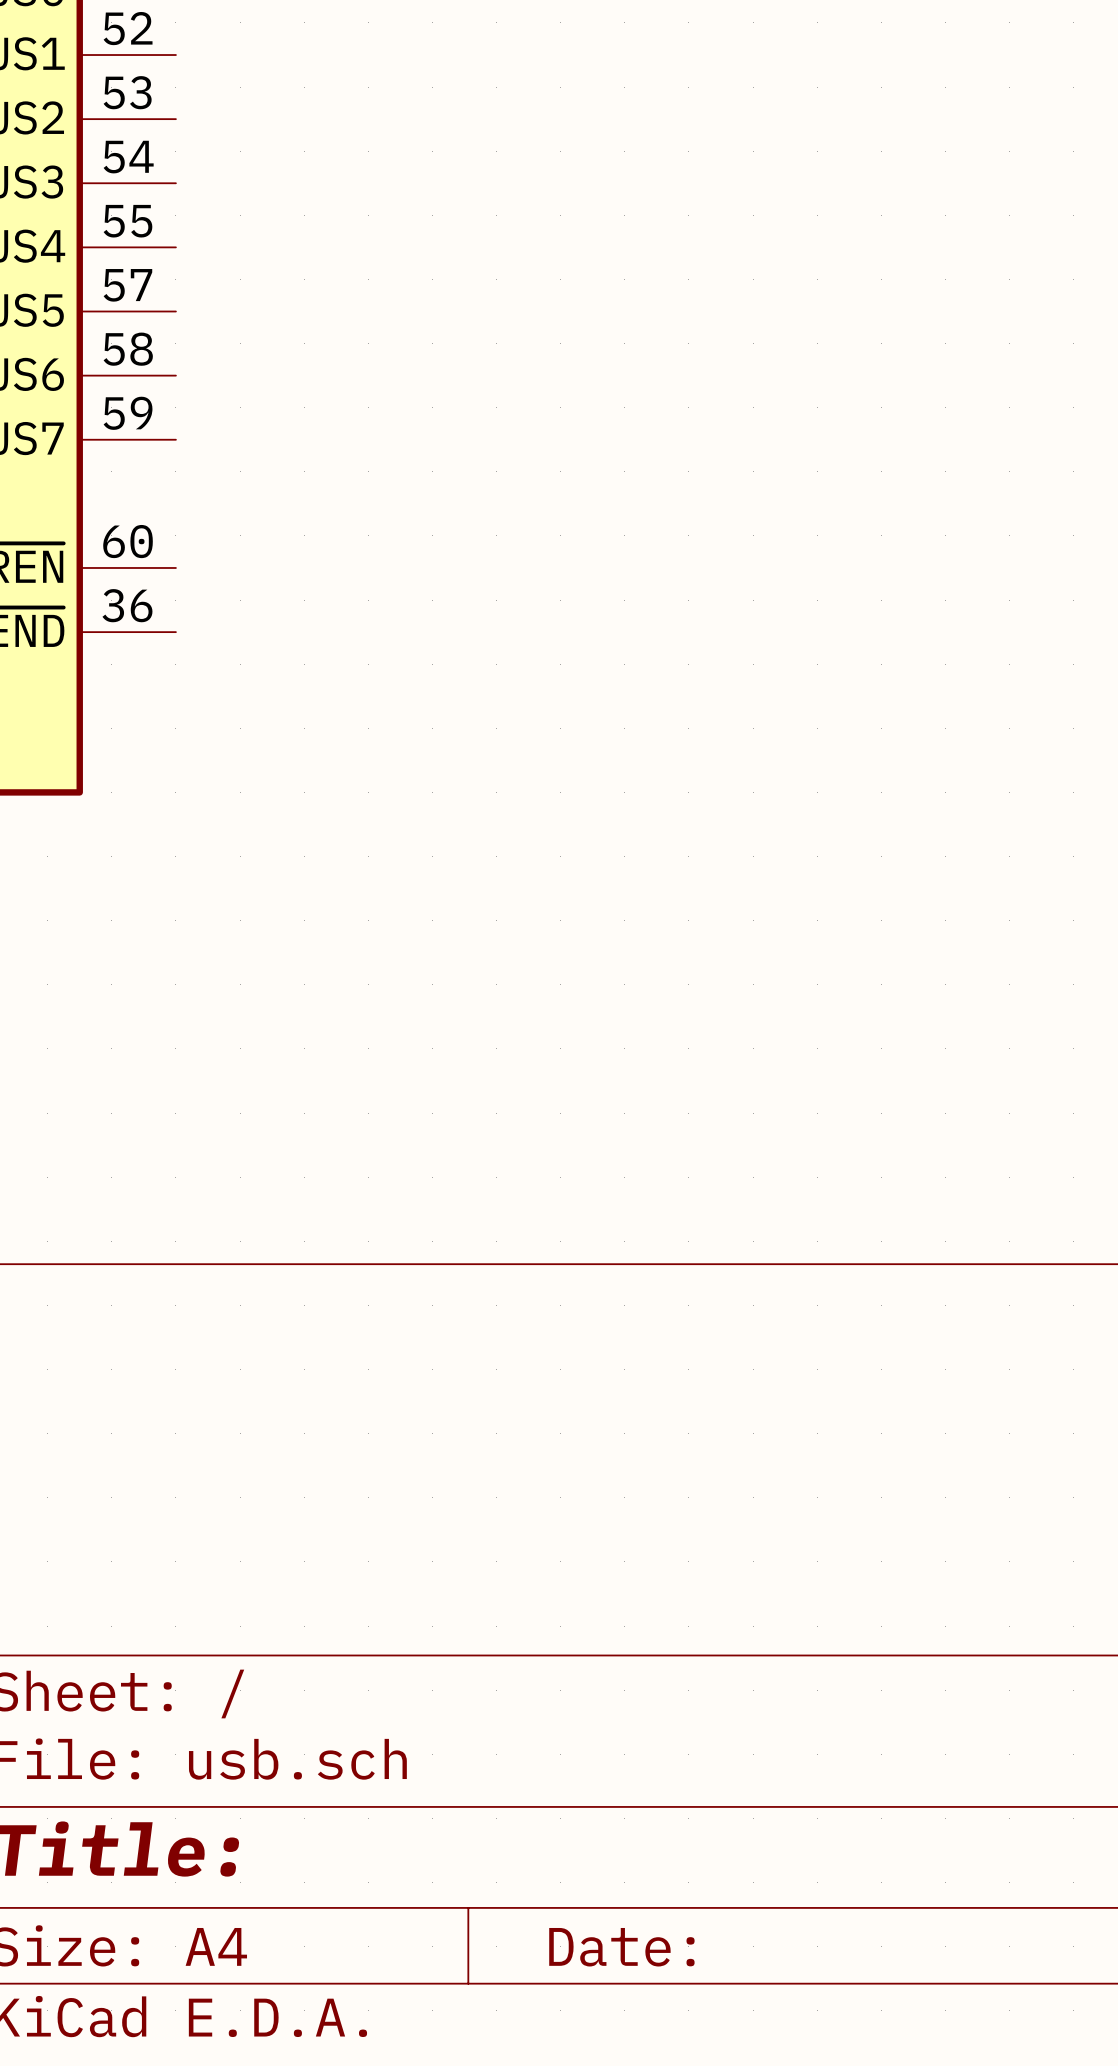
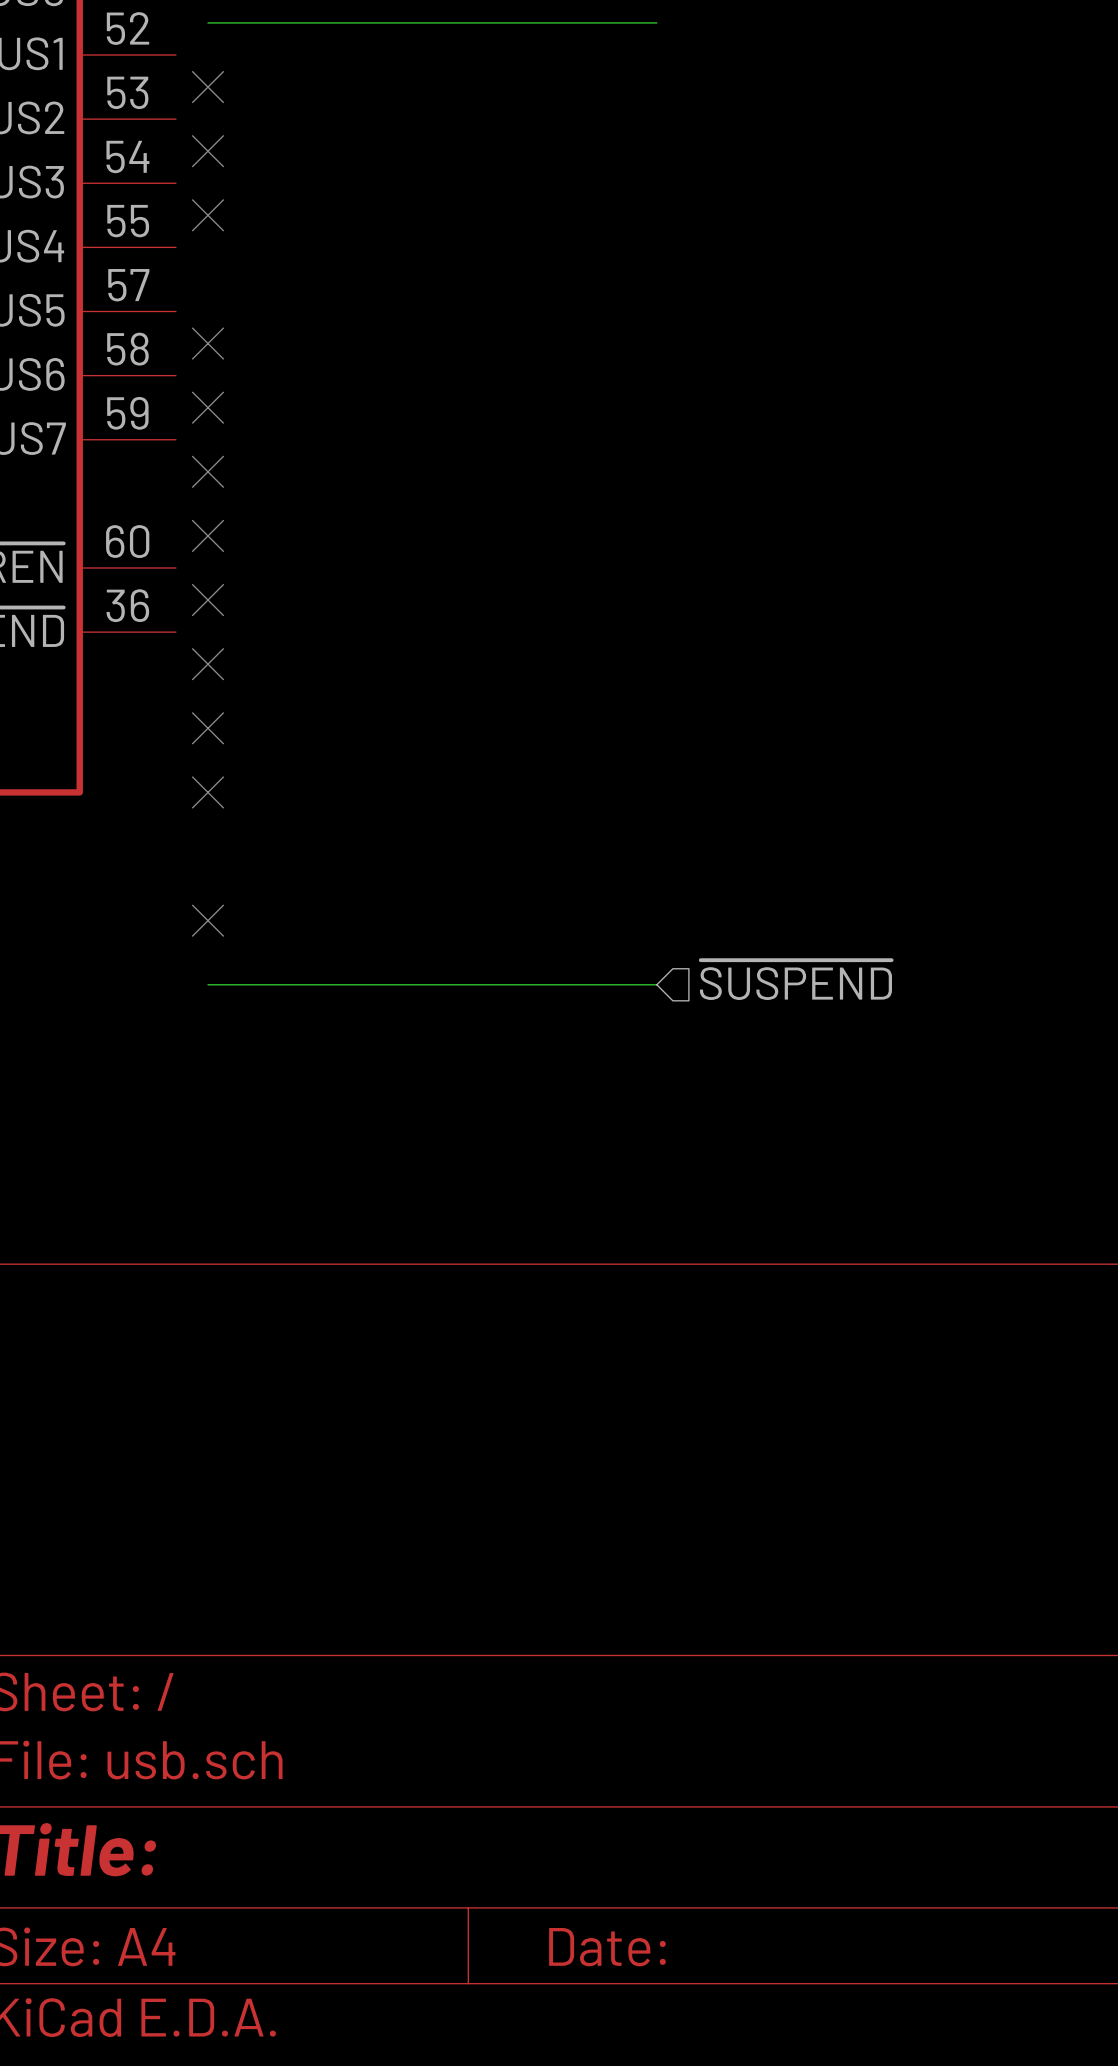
wire: none -> (207, 22) (656, 22)
no-connect mark: none -> (207, 87)
no-connect mark: none -> (207, 151)
no-connect mark: none -> (207, 215)
no-connect mark: none -> (207, 343)
no-connect mark: none -> (207, 407)
no-connect mark: none -> (207, 471)
no-connect mark: none -> (207, 535)
no-connect mark: none -> (207, 600)
no-connect mark: none -> (207, 664)
no-connect mark: none -> (207, 728)
no-connect mark: none -> (207, 792)
no-connect mark: none -> (207, 920)
hierarchical label: none -> ~{SUSPEND} (795, 980)
wire: none -> (207, 984) (656, 984)

